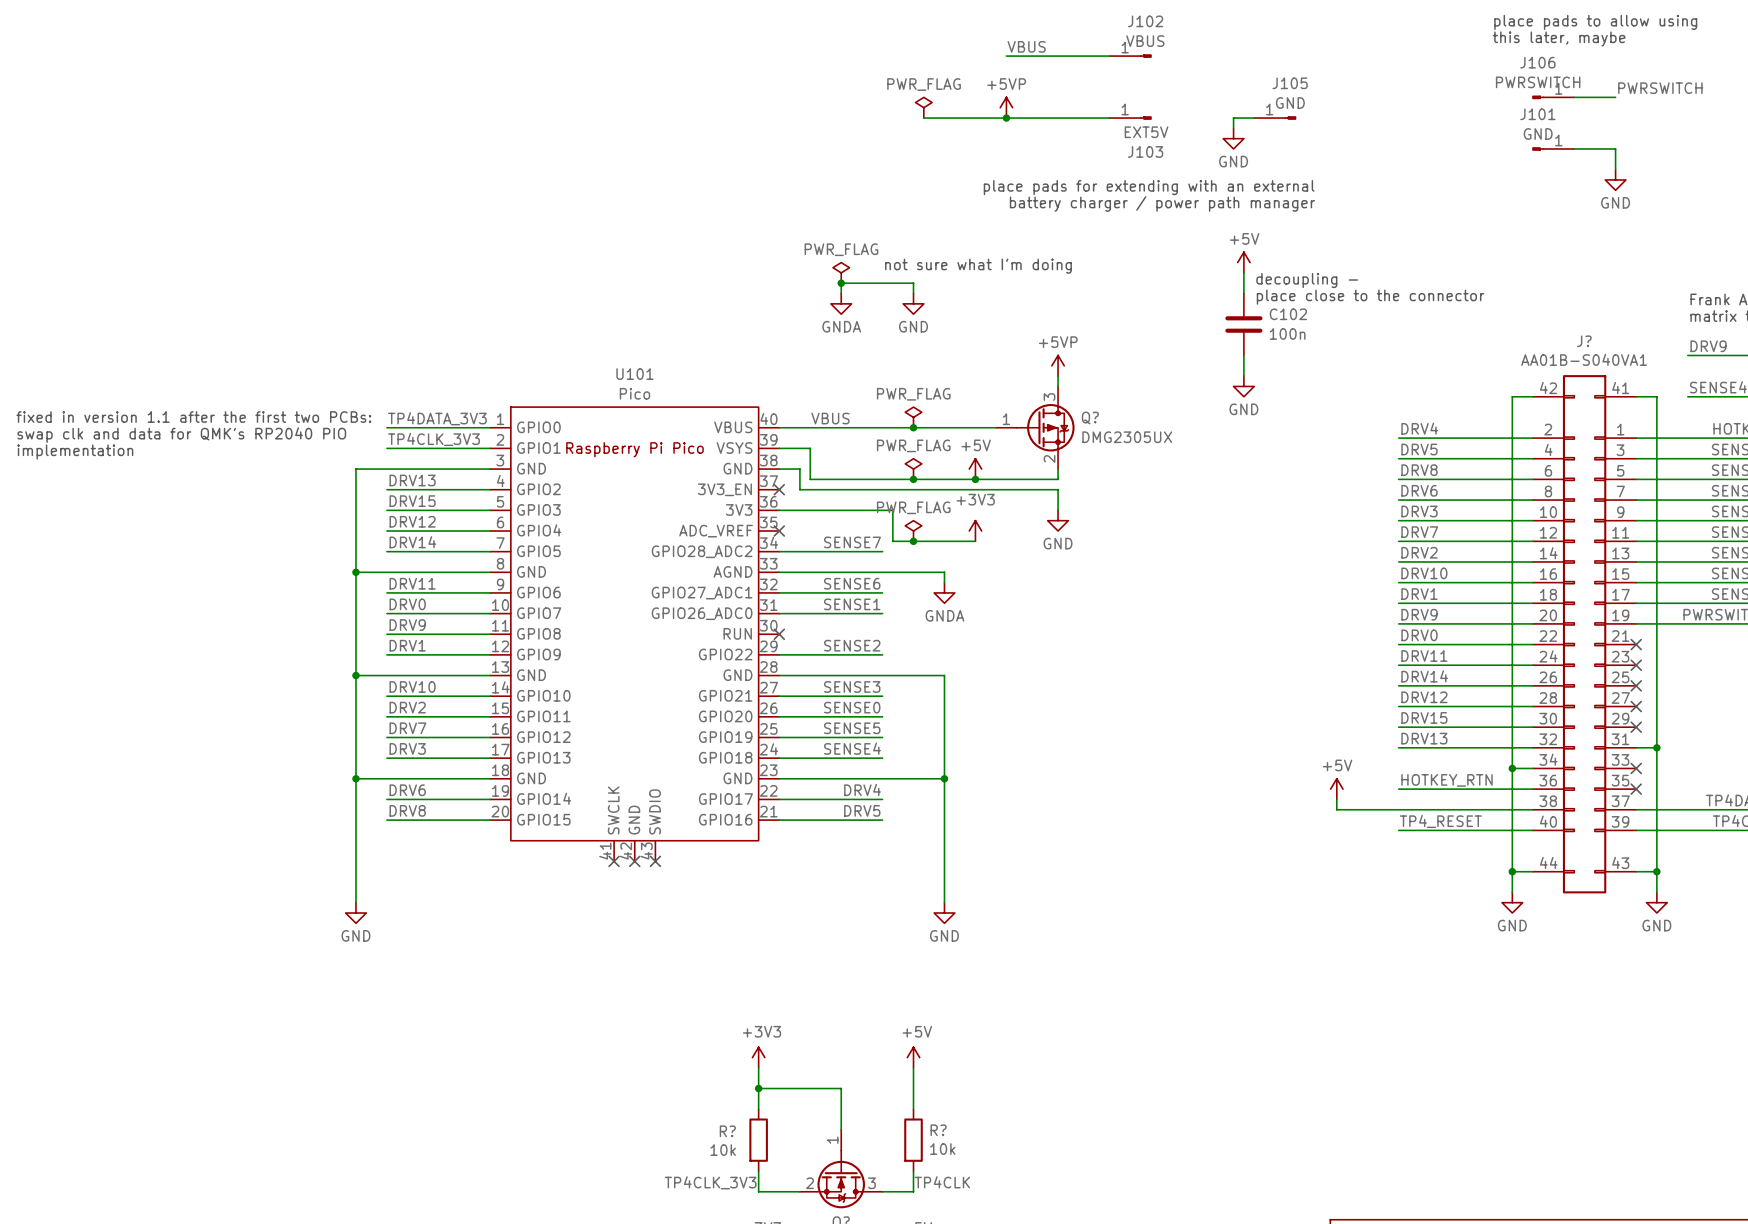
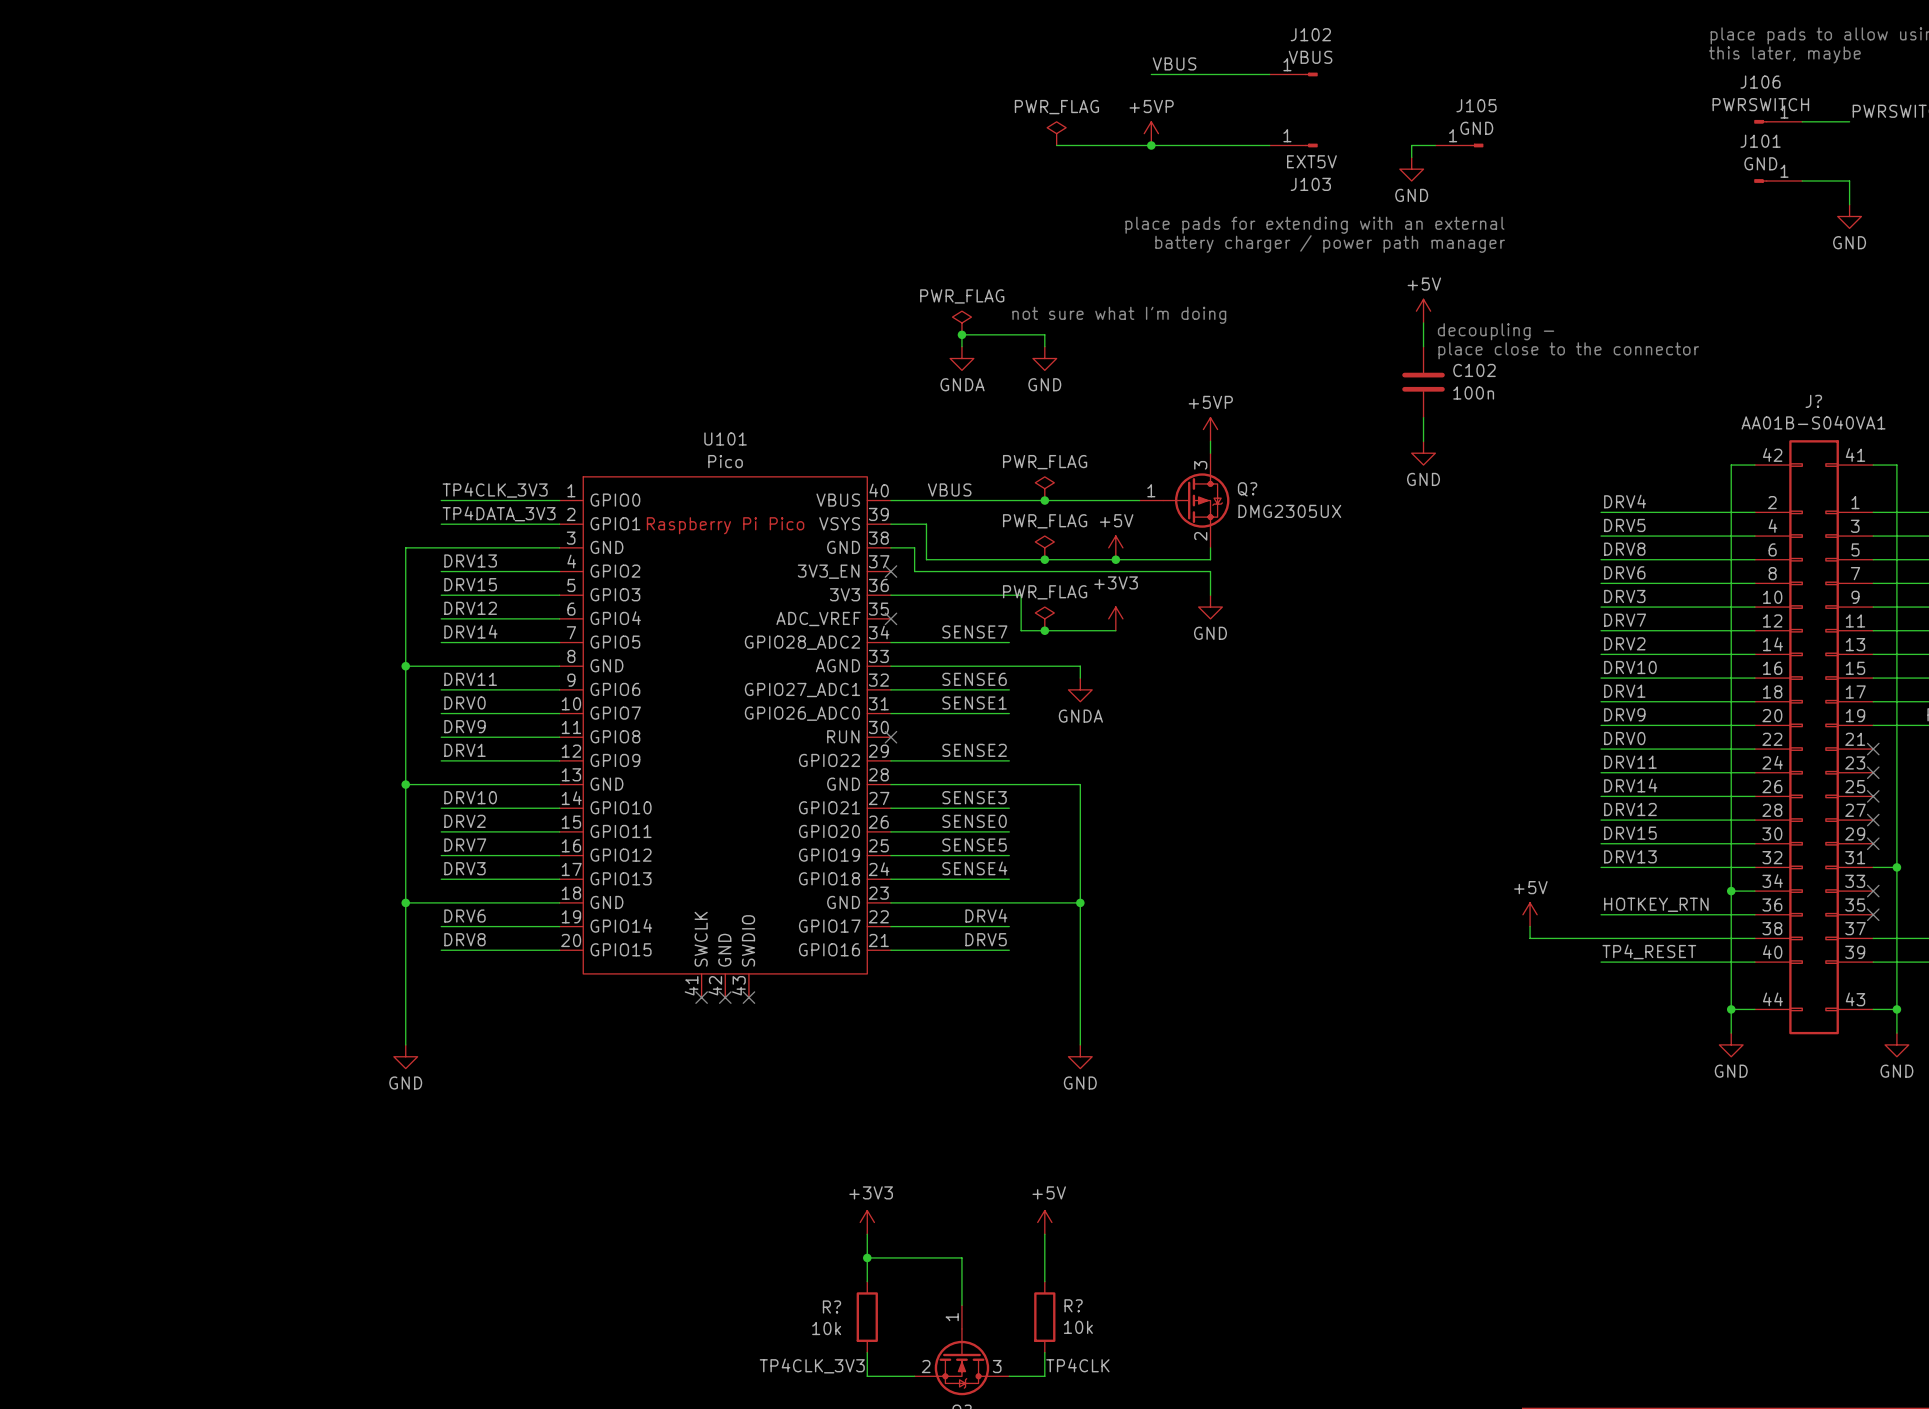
text: fixed in version 1.1 after the first two PCBs: (193, 417) -> none
label: TP4DATA_3V3 (437, 418) -> TP4CLK_3V3 (495, 490)
text: swap clk and data for QMK's RP2040 PIO (181, 435) -> none
label: TP4CLK_3V3 (433, 439) -> TP4DATA_3V3 (499, 513)
text: implementation (75, 451) -> none

